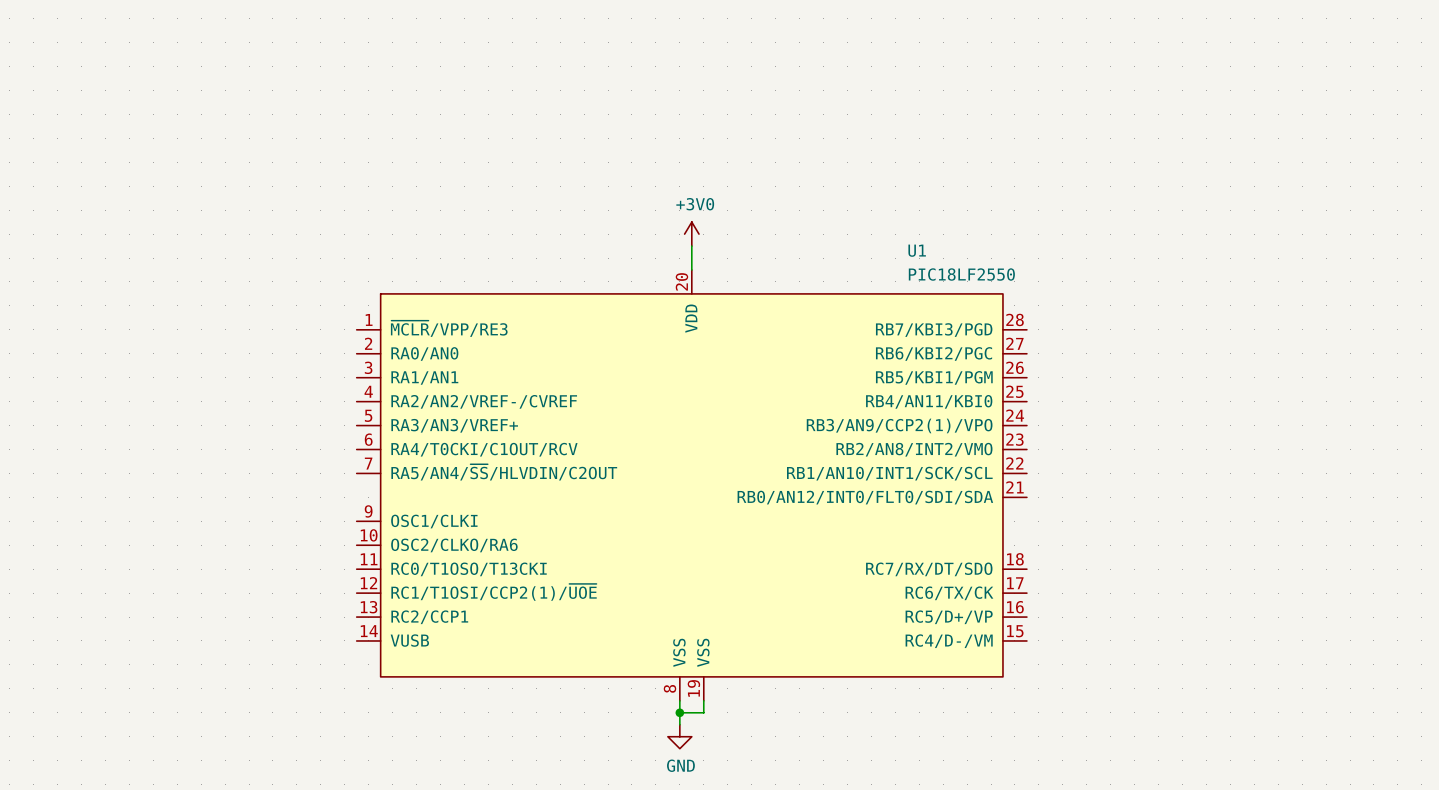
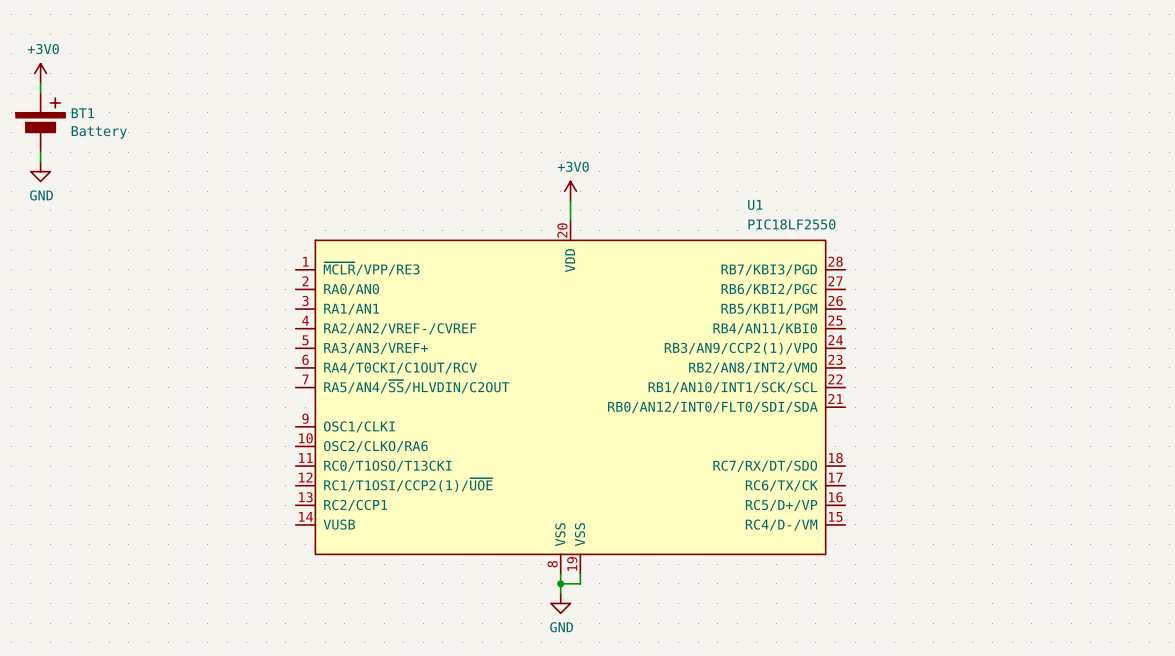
power symbol: none -> +3V0 (40, 73)
wire: none -> (40, 83) (40, 93)
BT1: none -> Battery (40, 122)
wire: none -> (40, 152) (40, 161)
power symbol: none -> GND (40, 171)

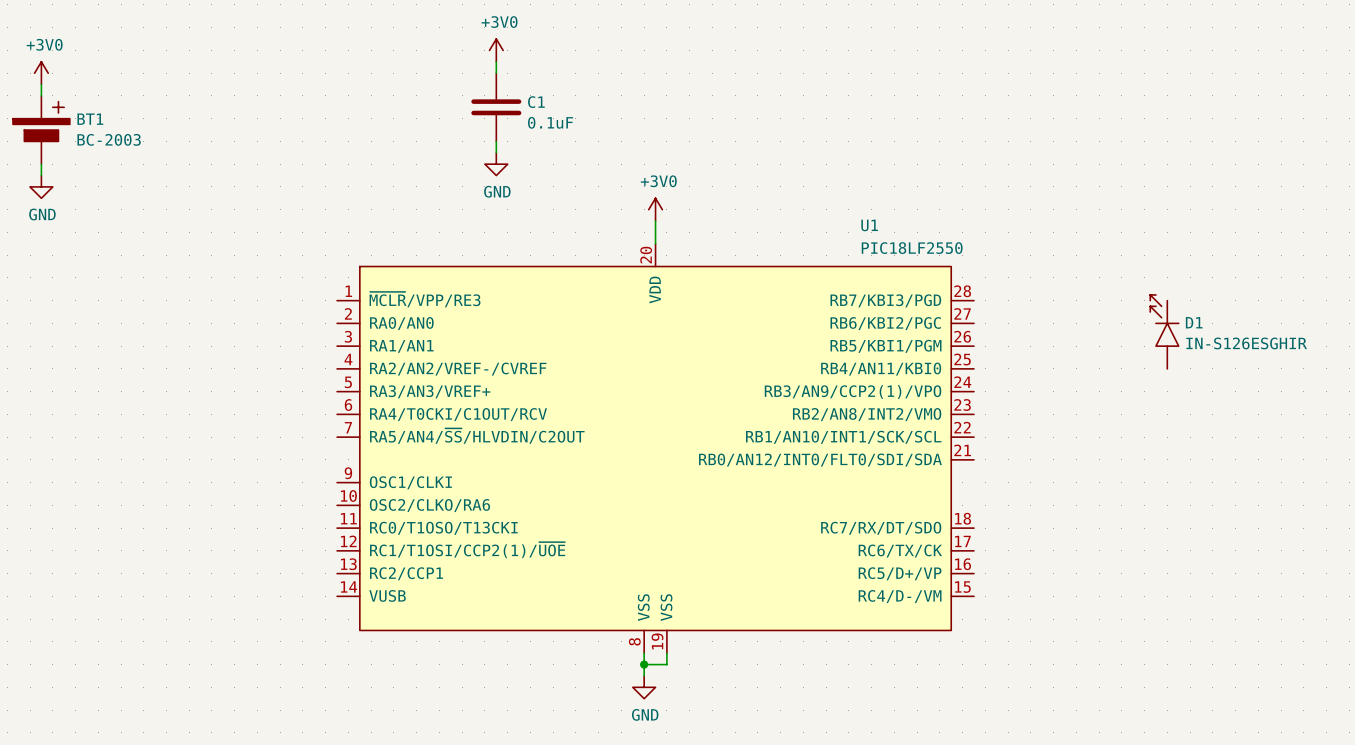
power symbol: none -> +3V0 (496, 50)
wire: none -> (496, 61) (496, 73)
C1: none -> 0.1uF (496, 107)
BT1 value: Battery (99, 132) -> BC-2003 (109, 139)
wire: none -> (496, 141) (496, 152)
power symbol: none -> GND (496, 164)
D1: none -> IN-S126ESGHIR (1164, 331)

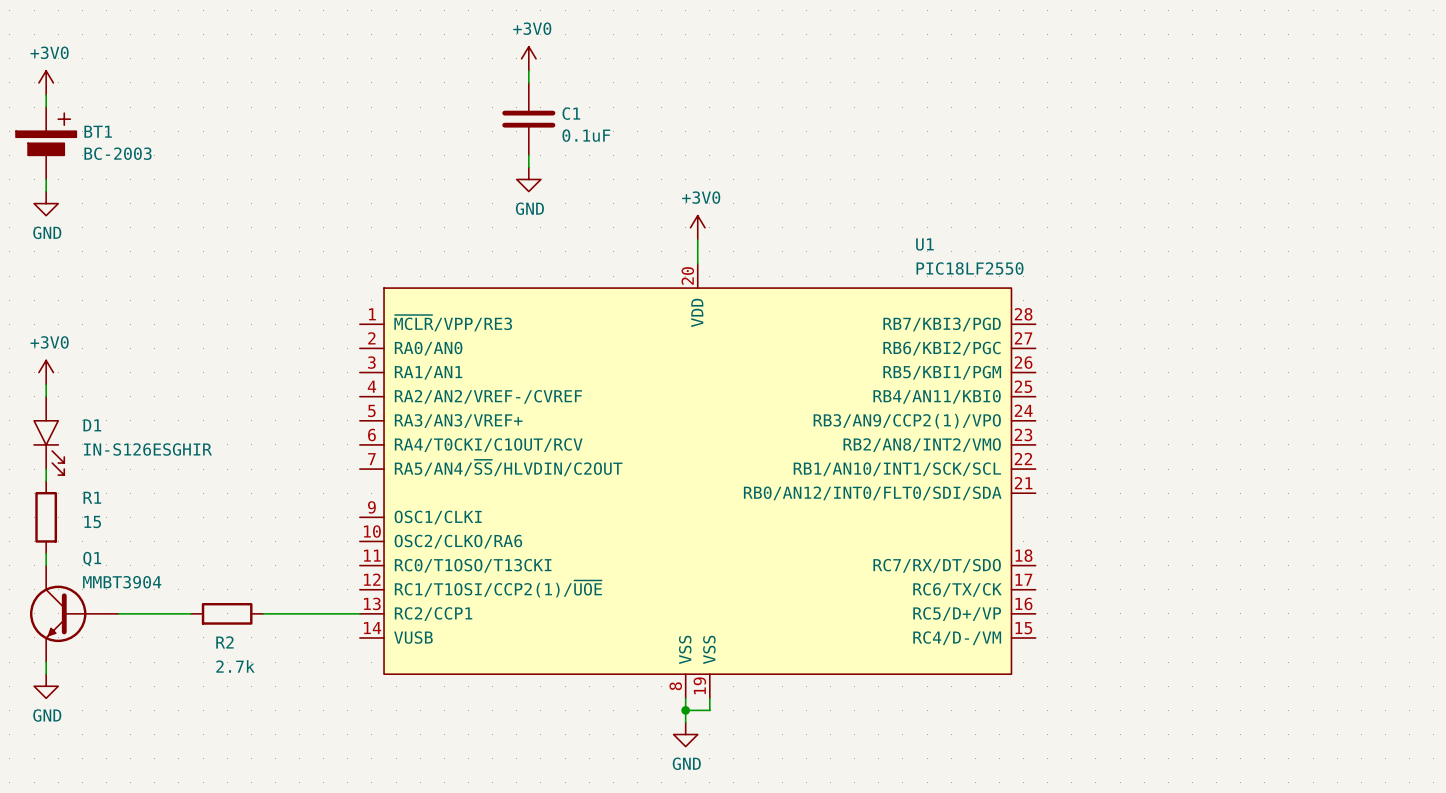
D1 rotation: 0° (1164, 320) -> 180° (49, 447)
D1 position: (1164, 331) -> (49, 435)
power symbol: none -> +3V0 (46, 372)
wire: none -> (46, 384) (46, 396)
wire: none -> (46, 469) (46, 481)
R1: none -> 15 (46, 517)
wire: none -> (46, 553) (46, 565)
Q1: none -> MMBT3904 (74, 613)
wire: none -> (118, 613) (190, 613)
R2: none -> 2.7k (227, 613)
wire: none -> (263, 613) (359, 613)
wire: none -> (46, 662) (46, 674)
power symbol: none -> GND (46, 686)

